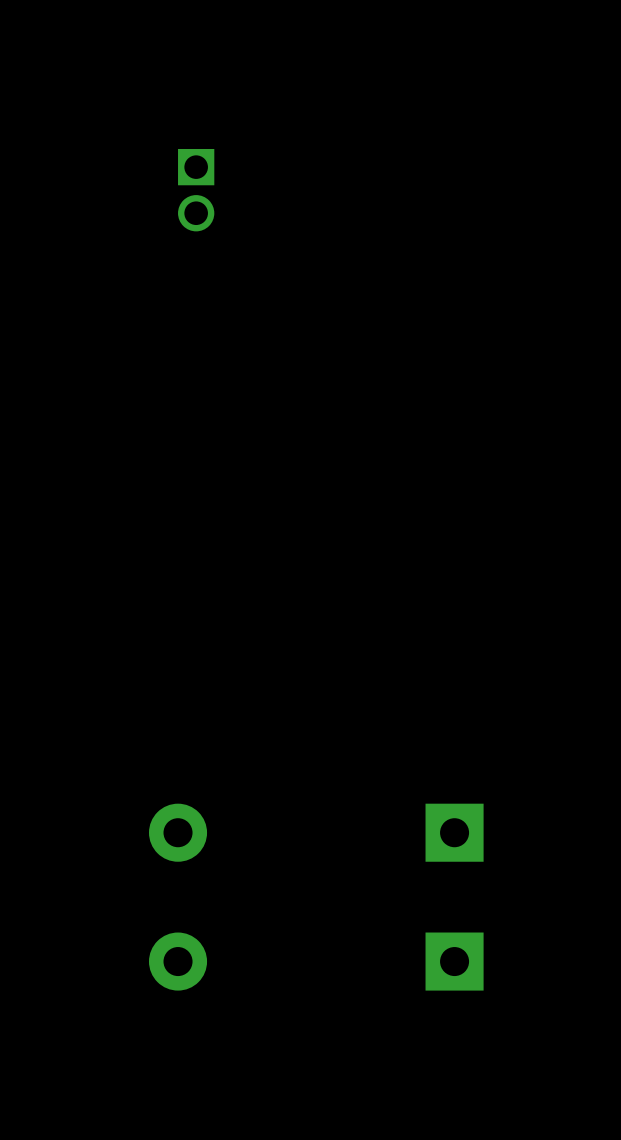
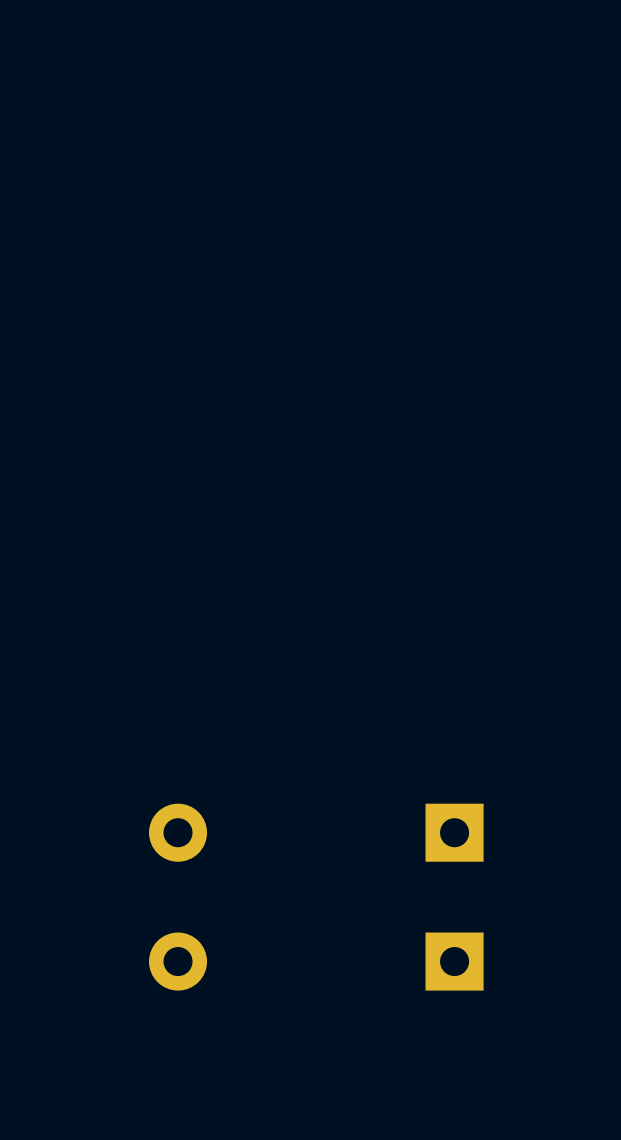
part: (196, 190) -> none

